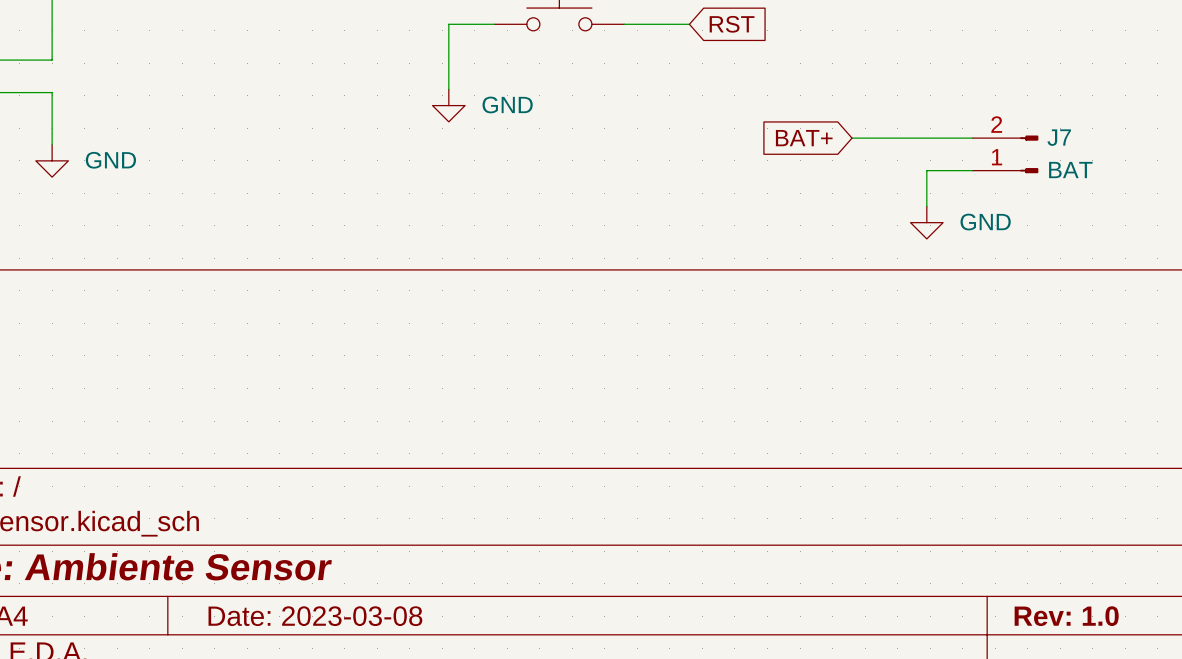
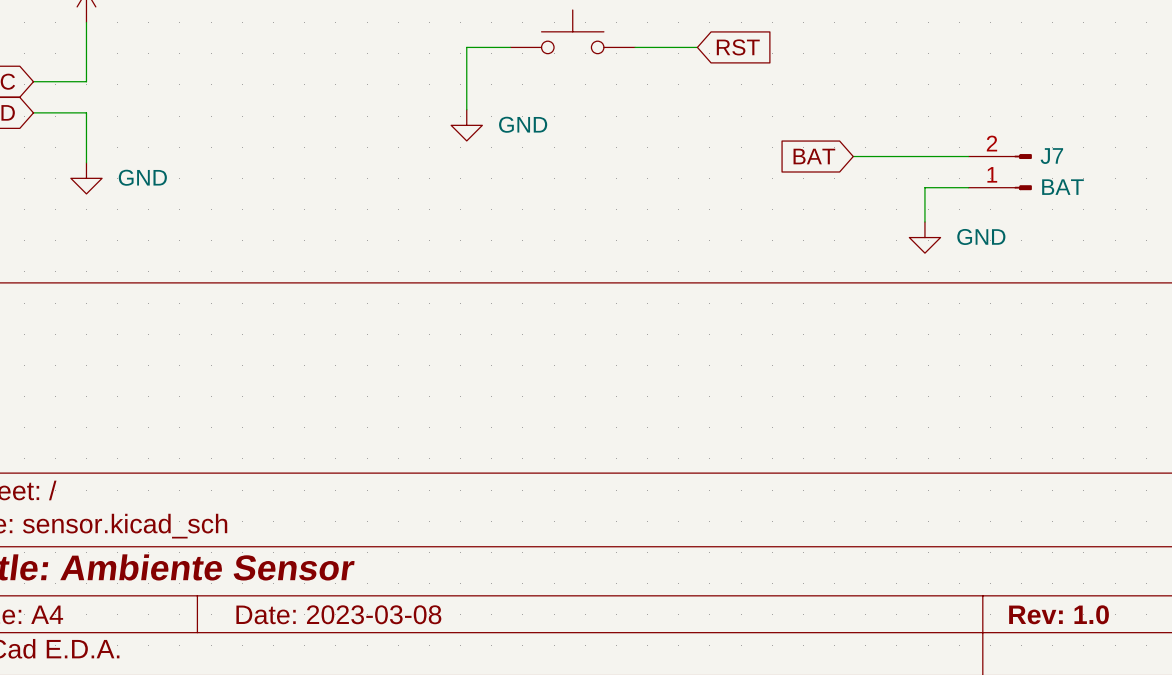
global label: BAT+ (804, 138) -> BAT (814, 156)

